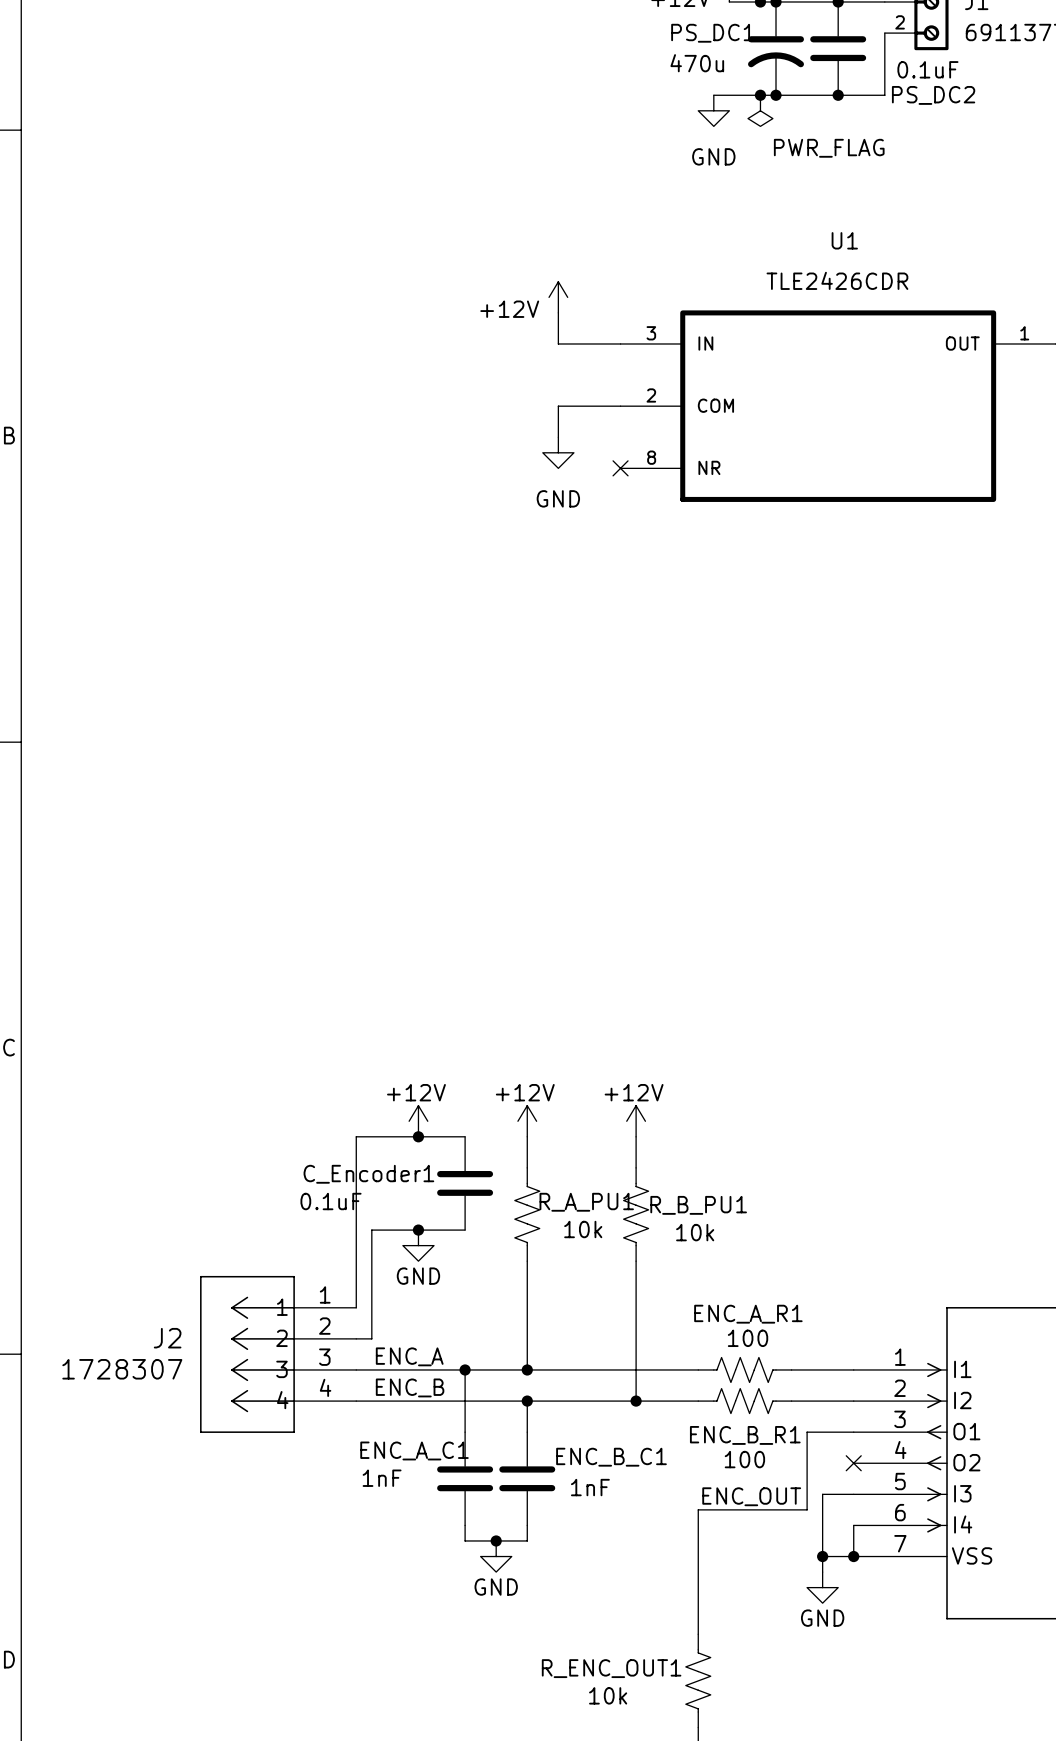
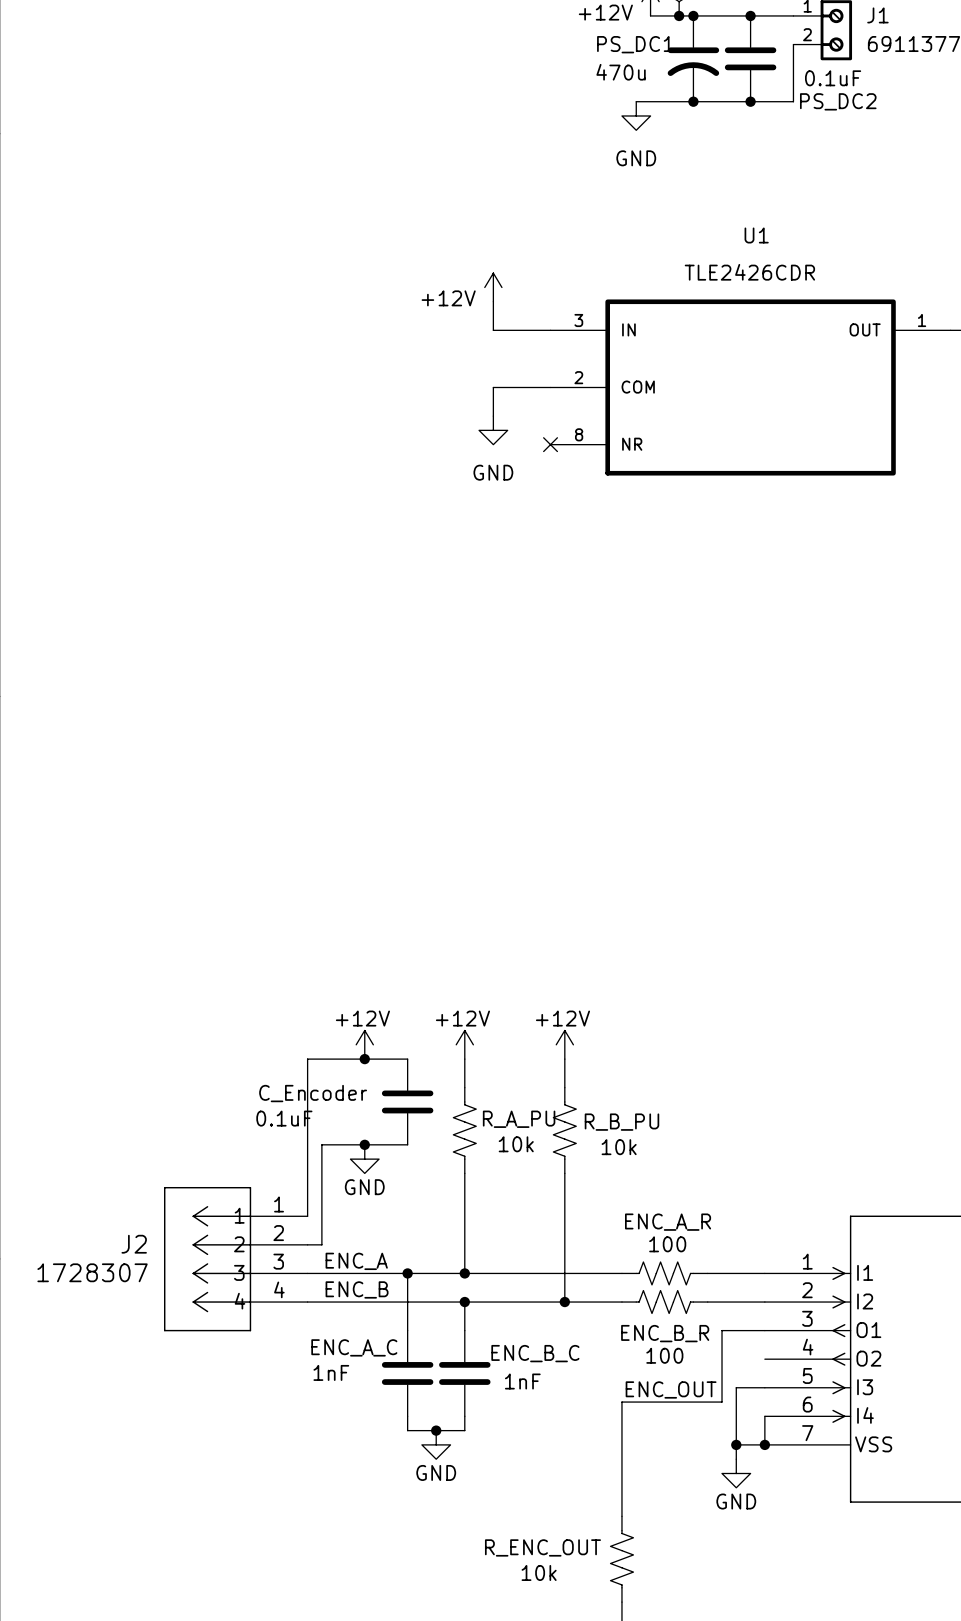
junction: (760, 95) -> none
power symbol: PWR_FLAG (760, 110) -> none
C_Encoder1 name: C_Encoder1 (368, 1174) -> C_Encoder (313, 1093)
R_A_PU1 name: R_A_PU1 (586, 1202) -> R_A_PU (519, 1119)
R_B_PU1 name: R_B_PU1 (698, 1205) -> R_B_PU (621, 1122)
ENC_A_R1 name: ENC_A_R1 (748, 1314) -> ENC_A_R (668, 1222)
ENC_B_R1 name: ENC_B_R1 (745, 1435) -> ENC_B_R (665, 1333)
ENC_A_C1 name: ENC_A_C1 (414, 1450) -> ENC_A_C (354, 1347)
ENC_B_C1 name: ENC_B_C1 (611, 1457) -> ENC_B_C (535, 1353)
no-connect mark: (853, 1463) -> none
R_ENC_OUT1 name: R_ENC_OUT1 (611, 1668) -> R_ENC_OUT (542, 1547)

